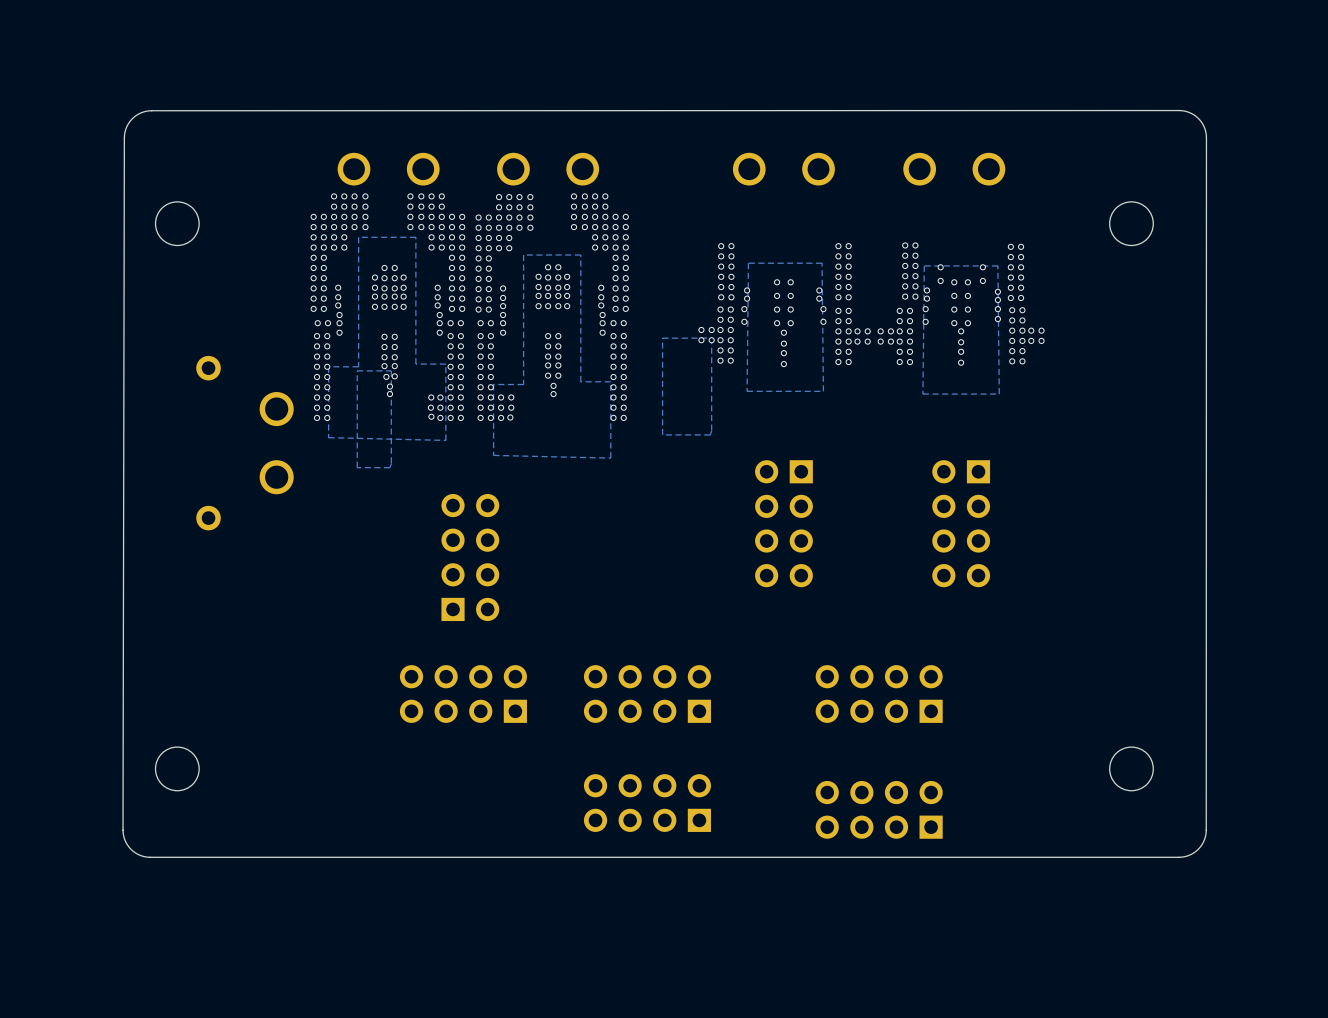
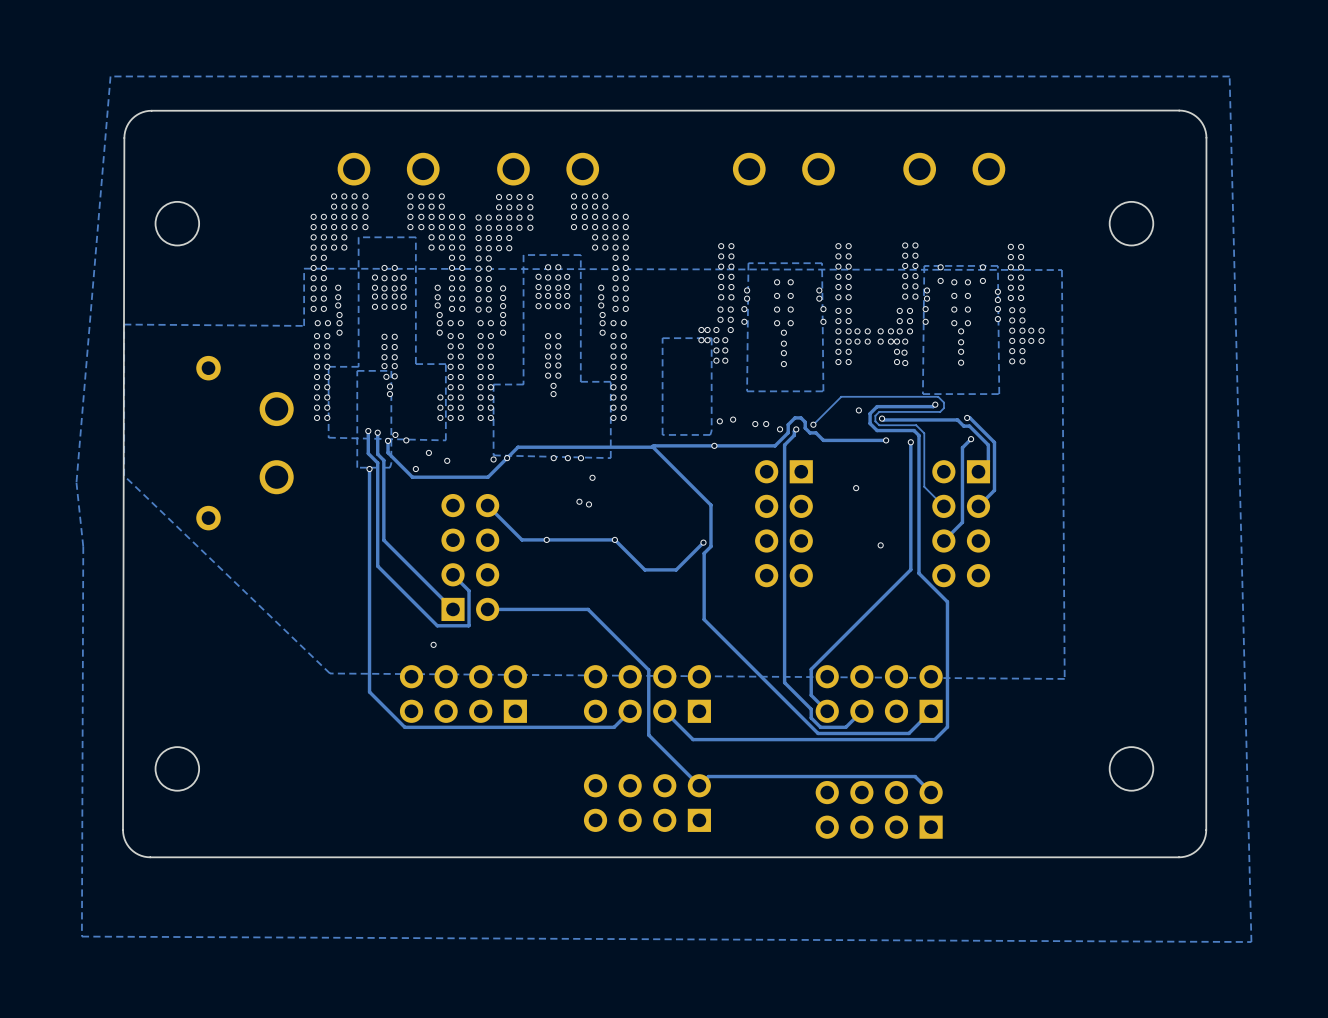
zone outline: none -> (1229, 76) (110, 76) (76, 482) (83, 546) (81, 936) (1251, 942) (1229, 76)
zone outline: none -> (304, 268) (304, 325) (124, 324) (124, 475) (330, 673) (1064, 678) (1061, 270) (304, 268)
via: none -> (707, 330)
via: (711, 330) -> none
via: none -> (716, 330)
via: (720, 330) -> none
via: none -> (707, 340)
via: (711, 340) -> none
via: none -> (716, 340)
via: (720, 340) -> none
via: none -> (725, 340)
via: (730, 340) -> none
via: none -> (897, 341)
via: (899, 341) -> none
via: none -> (905, 341)
via: (909, 341) -> none
via: none -> (716, 350)
via: (720, 350) -> none
via: none -> (725, 350)
via: (730, 350) -> none
via: none -> (897, 351)
via: (899, 351) -> none
via: (909, 351) -> none
via: none -> (904, 352)
via: none -> (716, 360)
via: (720, 360) -> none
via: none -> (725, 360)
via: (730, 360) -> none
via: none -> (897, 362)
via: (899, 362) -> none
via: (909, 362) -> none
via: none -> (905, 363)
via: (431, 397) -> none
via: (501, 397) -> none
via: (511, 397) -> none
track: none -> (935, 404) (933, 406) (877, 406) (870, 413) (870, 423) (877, 430) (914, 430) (919, 435) (919, 573) (947, 601) (947, 726) (934, 739) (693, 739) (664, 711)
via: none -> (935, 404)
via: (430, 407) -> none
via: (501, 407) -> none
via: (511, 407) -> none
via: none -> (858, 410)
via: (431, 416) -> none
via: (501, 417) -> none
via: (510, 417) -> none
track: none -> (967, 417) (969, 417) (994, 442) (994, 490) (978, 506)
via: none -> (967, 417)
track: none -> (882, 418) (957, 419) (963, 426) (969, 426) (988, 445) (988, 461) (978, 471)
via: none -> (882, 418)
via: none -> (733, 419)
via: none -> (719, 421)
via: none -> (755, 424)
via: none -> (766, 424)
track: none -> (813, 424) (841, 396) (938, 396) (944, 402) (944, 408) (940, 411) (879, 411) (875, 415) (875, 421) (879, 425) (916, 425) (924, 433) (924, 486) (943, 506)
via: none -> (813, 424)
via: none -> (780, 429)
track: none -> (796, 429) (794, 435) (784, 445) (784, 682) (811, 709) (811, 717) (820, 727) (845, 727) (861, 711)
via: none -> (796, 429)
track: none -> (368, 431) (368, 453) (377, 462) (377, 566) (437, 625) (468, 625) (469, 590) (453, 574)
via: none -> (368, 431)
track: none -> (377, 432) (377, 454) (383, 460) (383, 540) (453, 609)
via: none -> (377, 432)
via: none -> (395, 434)
track: none -> (971, 439) (962, 447) (962, 522) (943, 541)
via: none -> (971, 439)
track: none -> (388, 440) (388, 452) (412, 477) (488, 477) (518, 447) (653, 447)
via: none -> (388, 440)
via: none -> (406, 440)
track: none -> (886, 440) (823, 440) (815, 432) (810, 432) (805, 428) (805, 422) (800, 417) (794, 417) (788, 424) (788, 432) (775, 445) (653, 445)
via: none -> (886, 440)
track: none -> (910, 442) (910, 569) (811, 669) (811, 695) (827, 711)
via: none -> (910, 442)
via: none -> (714, 445)
track: none -> (653, 447) (710, 505) (710, 546) (704, 553) (704, 619) (818, 733) (908, 733) (931, 711)
via: none -> (428, 452)
via: none -> (507, 458)
via: none -> (553, 458)
via: none -> (567, 458)
via: none -> (580, 458)
via: none -> (493, 459)
via: none -> (447, 460)
track: none -> (369, 469) (369, 691) (404, 727) (614, 727) (630, 711)
via: none -> (369, 469)
via: none -> (415, 469)
via: none -> (592, 477)
via: none -> (856, 488)
via: none -> (579, 501)
via: none -> (588, 504)
track: none -> (487, 505) (521, 539) (614, 539) (644, 569) (676, 569) (703, 542)
via: none -> (546, 539)
via: none -> (614, 539)
via: none -> (703, 542)
via: none -> (880, 545)
track: none -> (487, 609) (588, 609) (648, 670) (648, 735) (699, 785) (708, 776) (915, 776) (931, 792)
via: none -> (433, 644)

